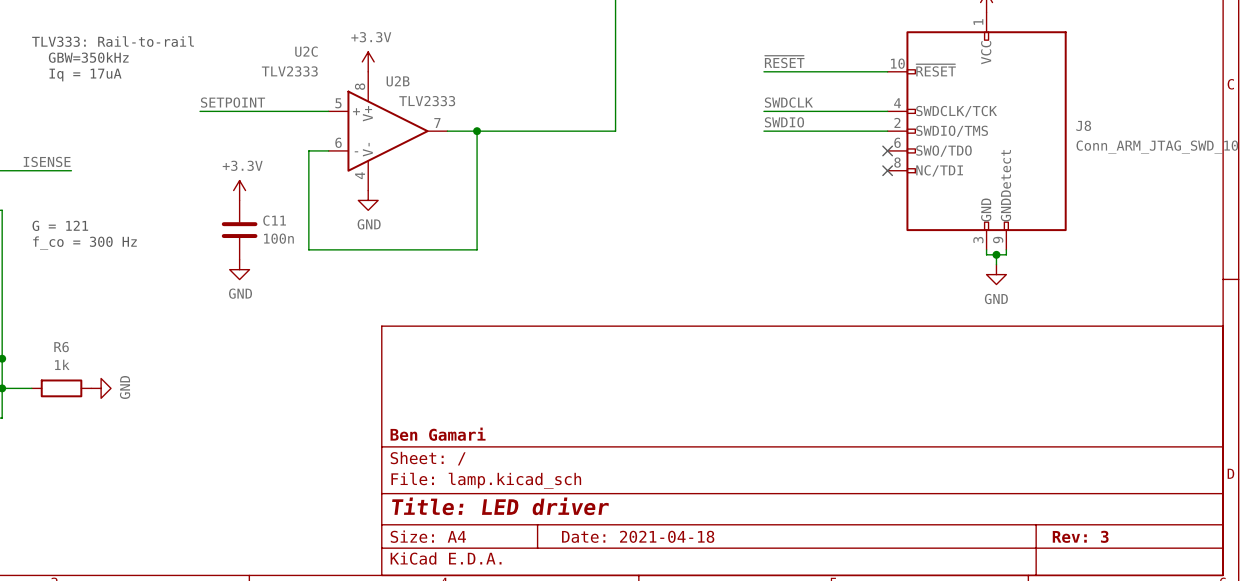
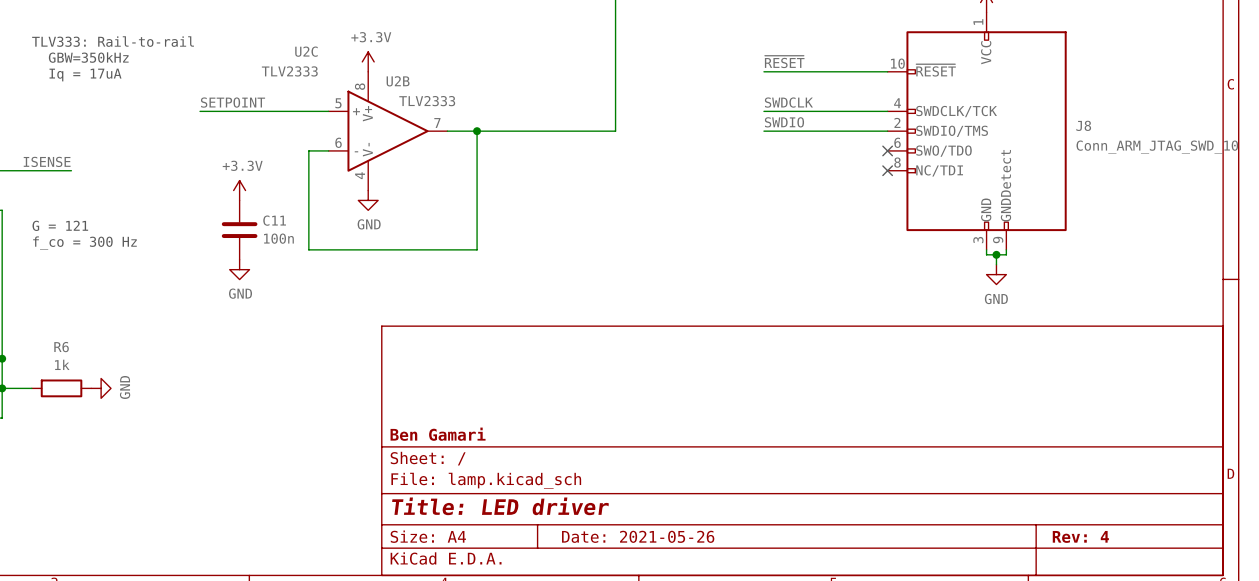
title block: Date: 2021-04-18 (638, 536) -> Date: 2021-05-26 (638, 536)
title block: Rev: 3 (1080, 536) -> Rev: 4 (1080, 536)

